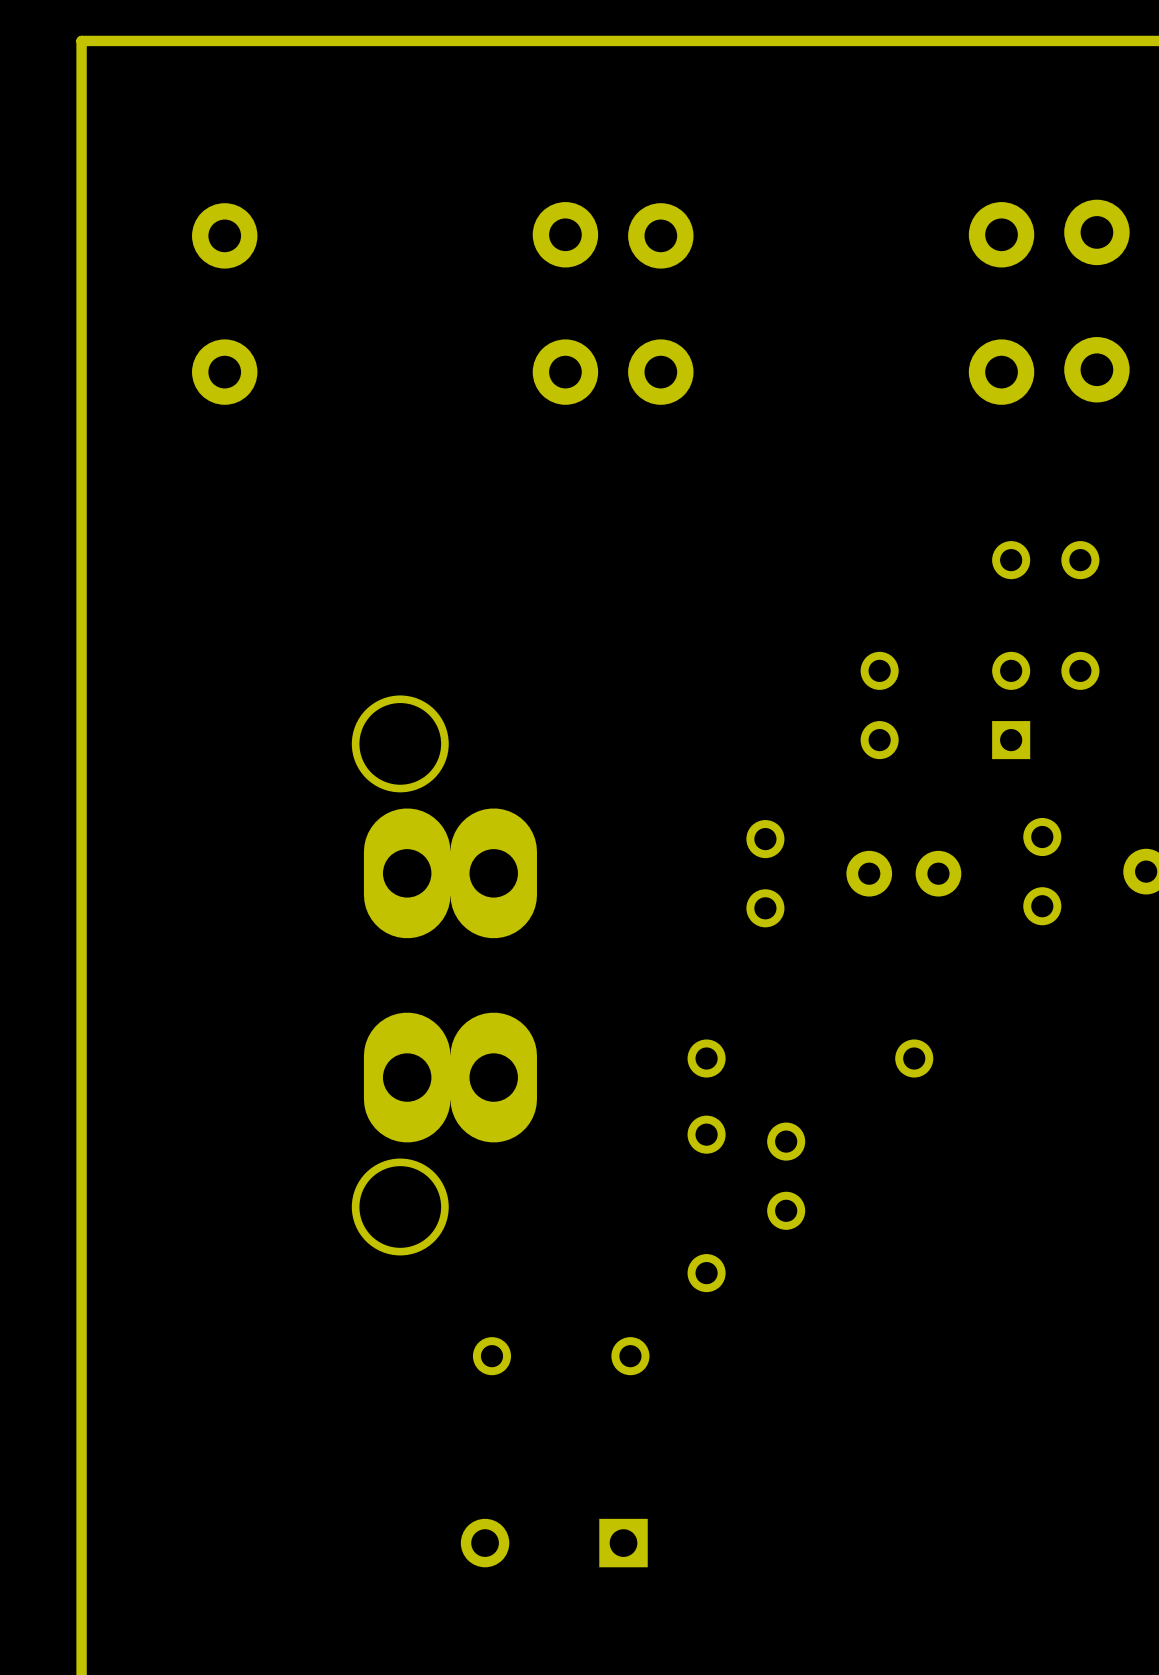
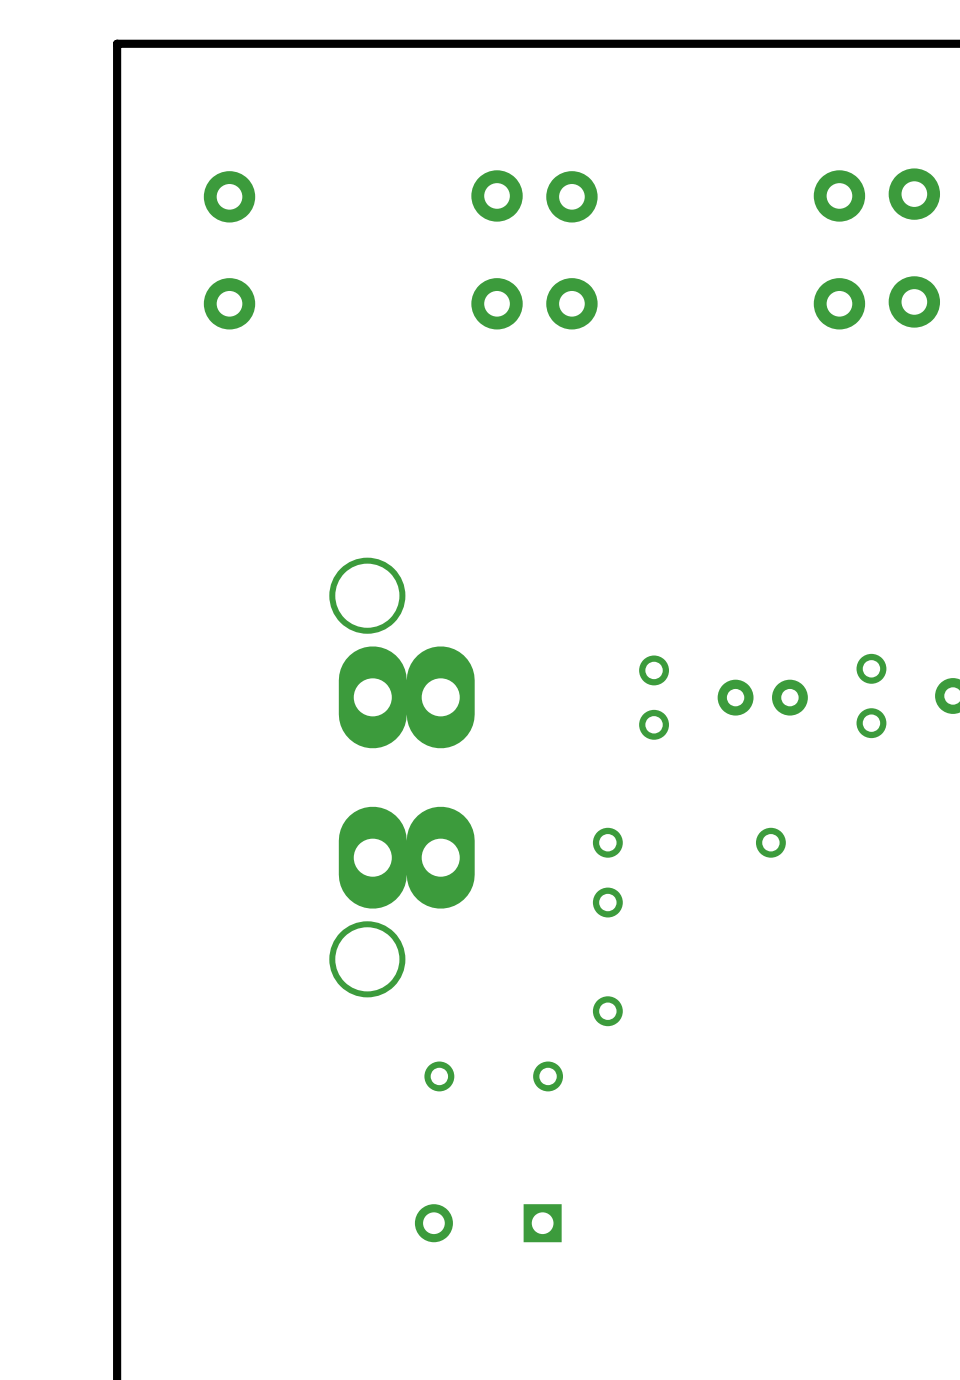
part: (1045, 560) -> none
part: (879, 705) -> none
part: (1045, 705) -> none
part: (786, 1176) -> none

